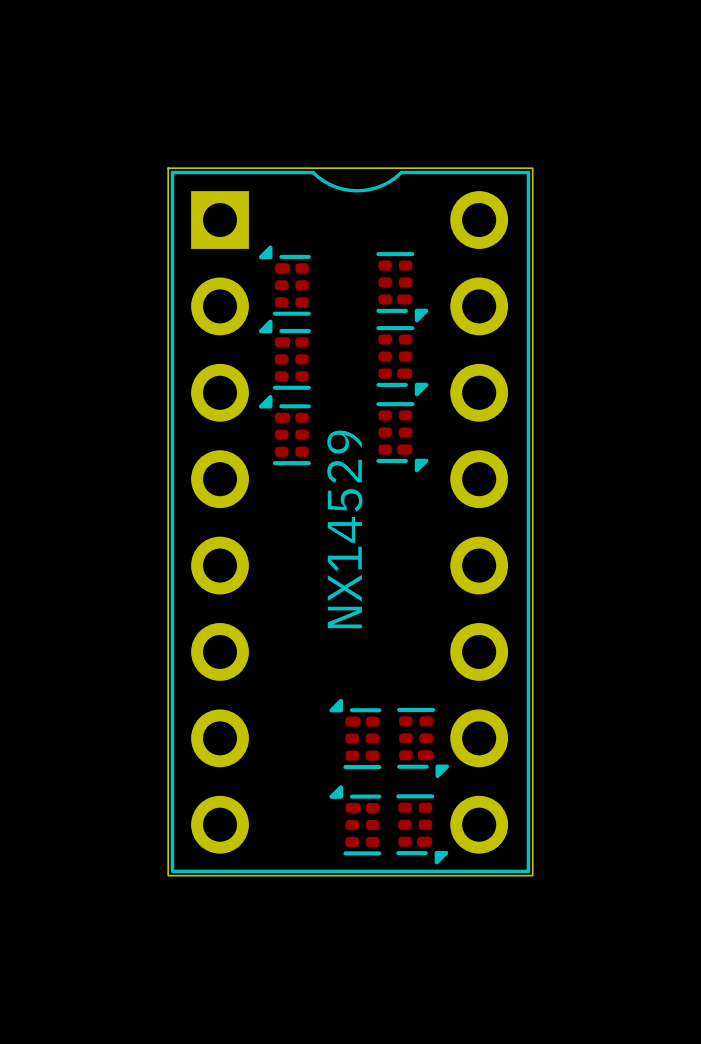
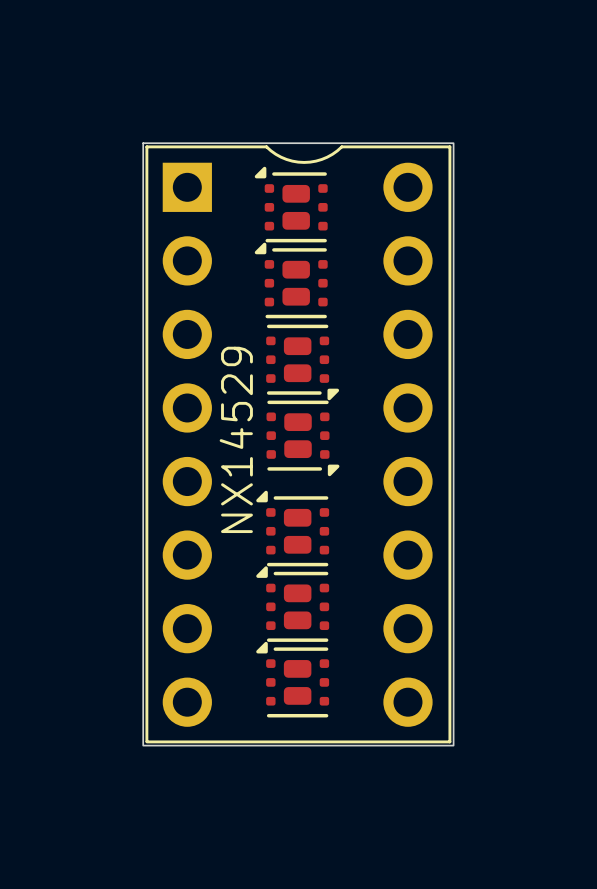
part: none -> (291, 204)
part: (284, 280) -> none
part: (402, 287) -> none
part: none -> (291, 280)
part: (284, 354) -> none
part: (402, 361) -> none
part: none -> (302, 362)
part: (284, 430) -> none
part: (402, 437) -> none
part: none -> (302, 438)
text position: NX14529 (344, 529) -> NX14529 (236, 439)
part: none -> (292, 528)
part footprint: [329, 698, 382, 770] -> [256, 566, 330, 642]
part: (423, 742) -> none
part footprint: [329, 785, 382, 856] -> [256, 641, 330, 718]
part: (422, 829) -> none

